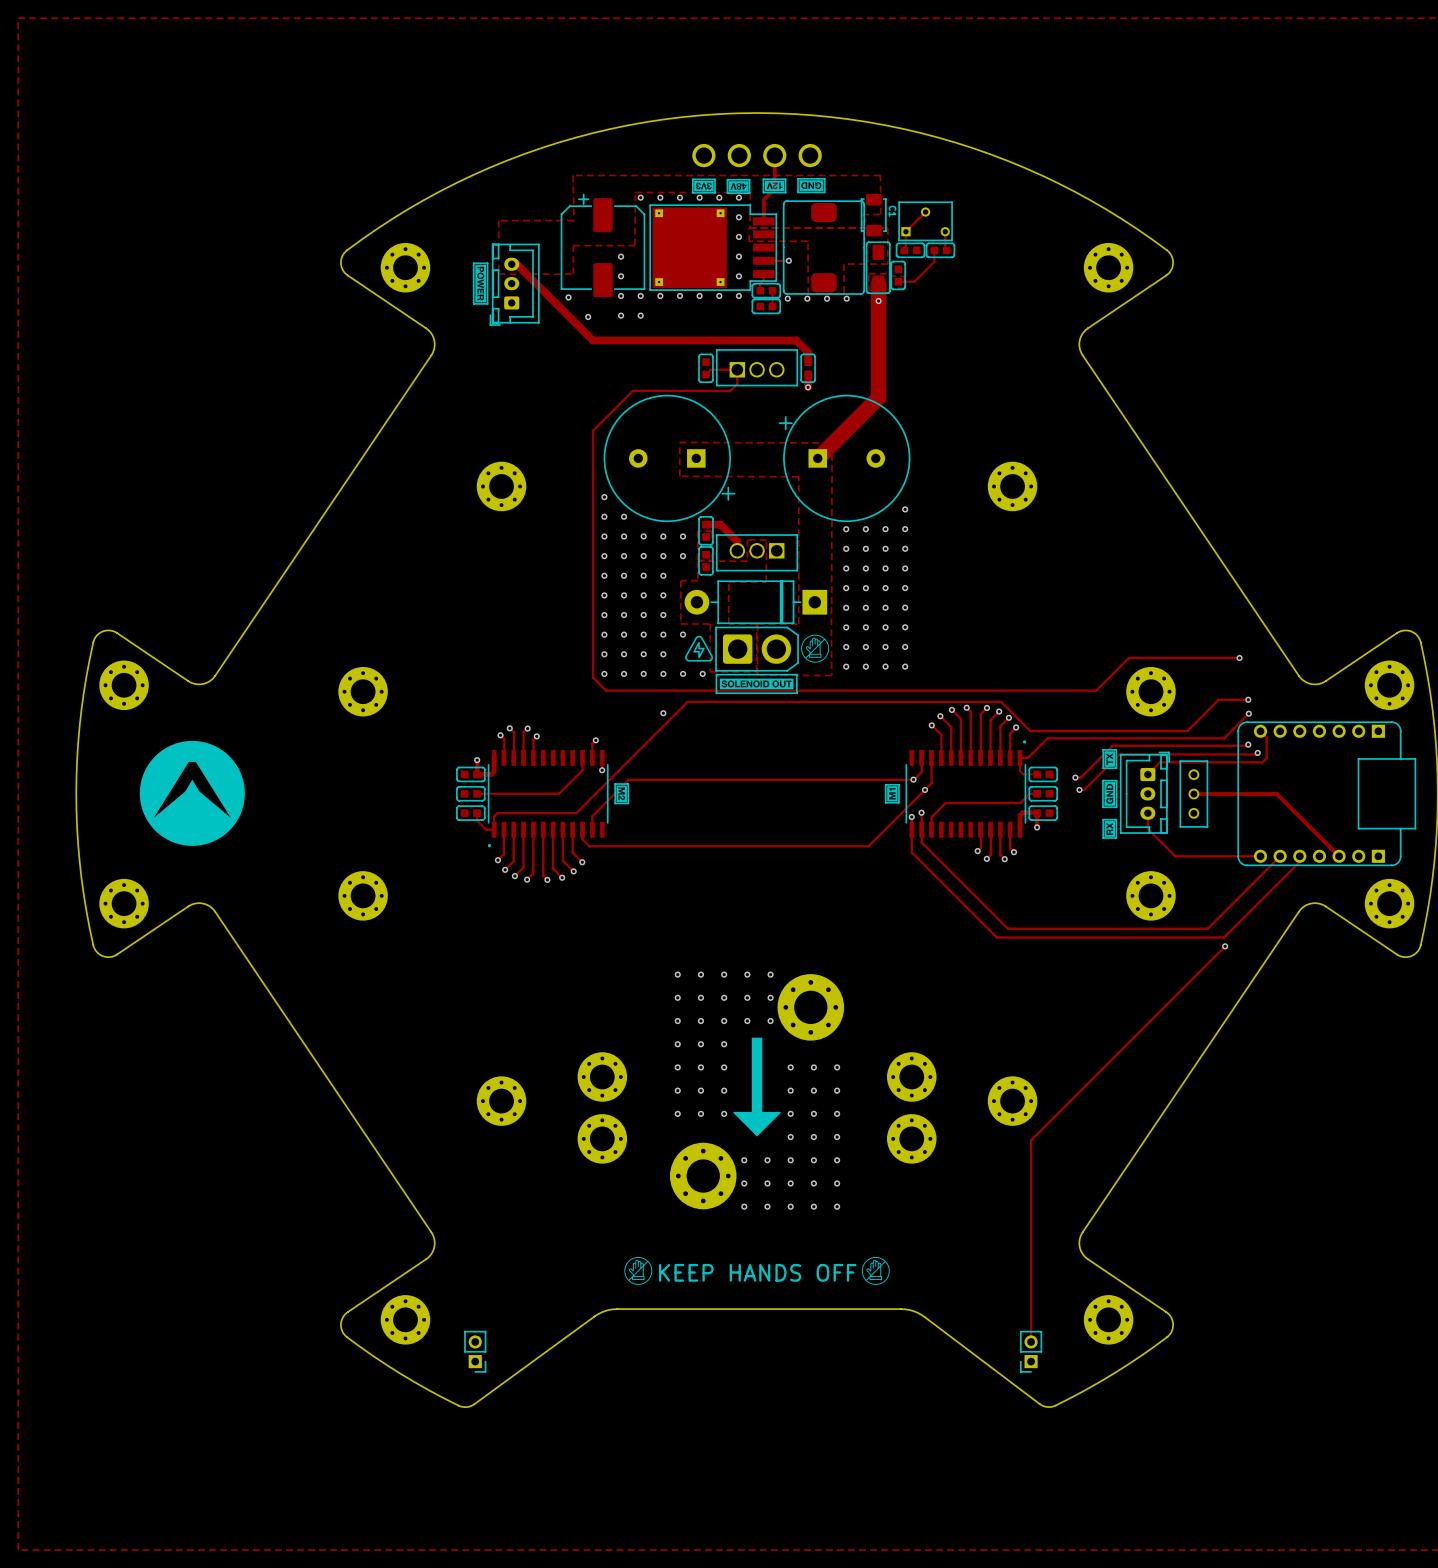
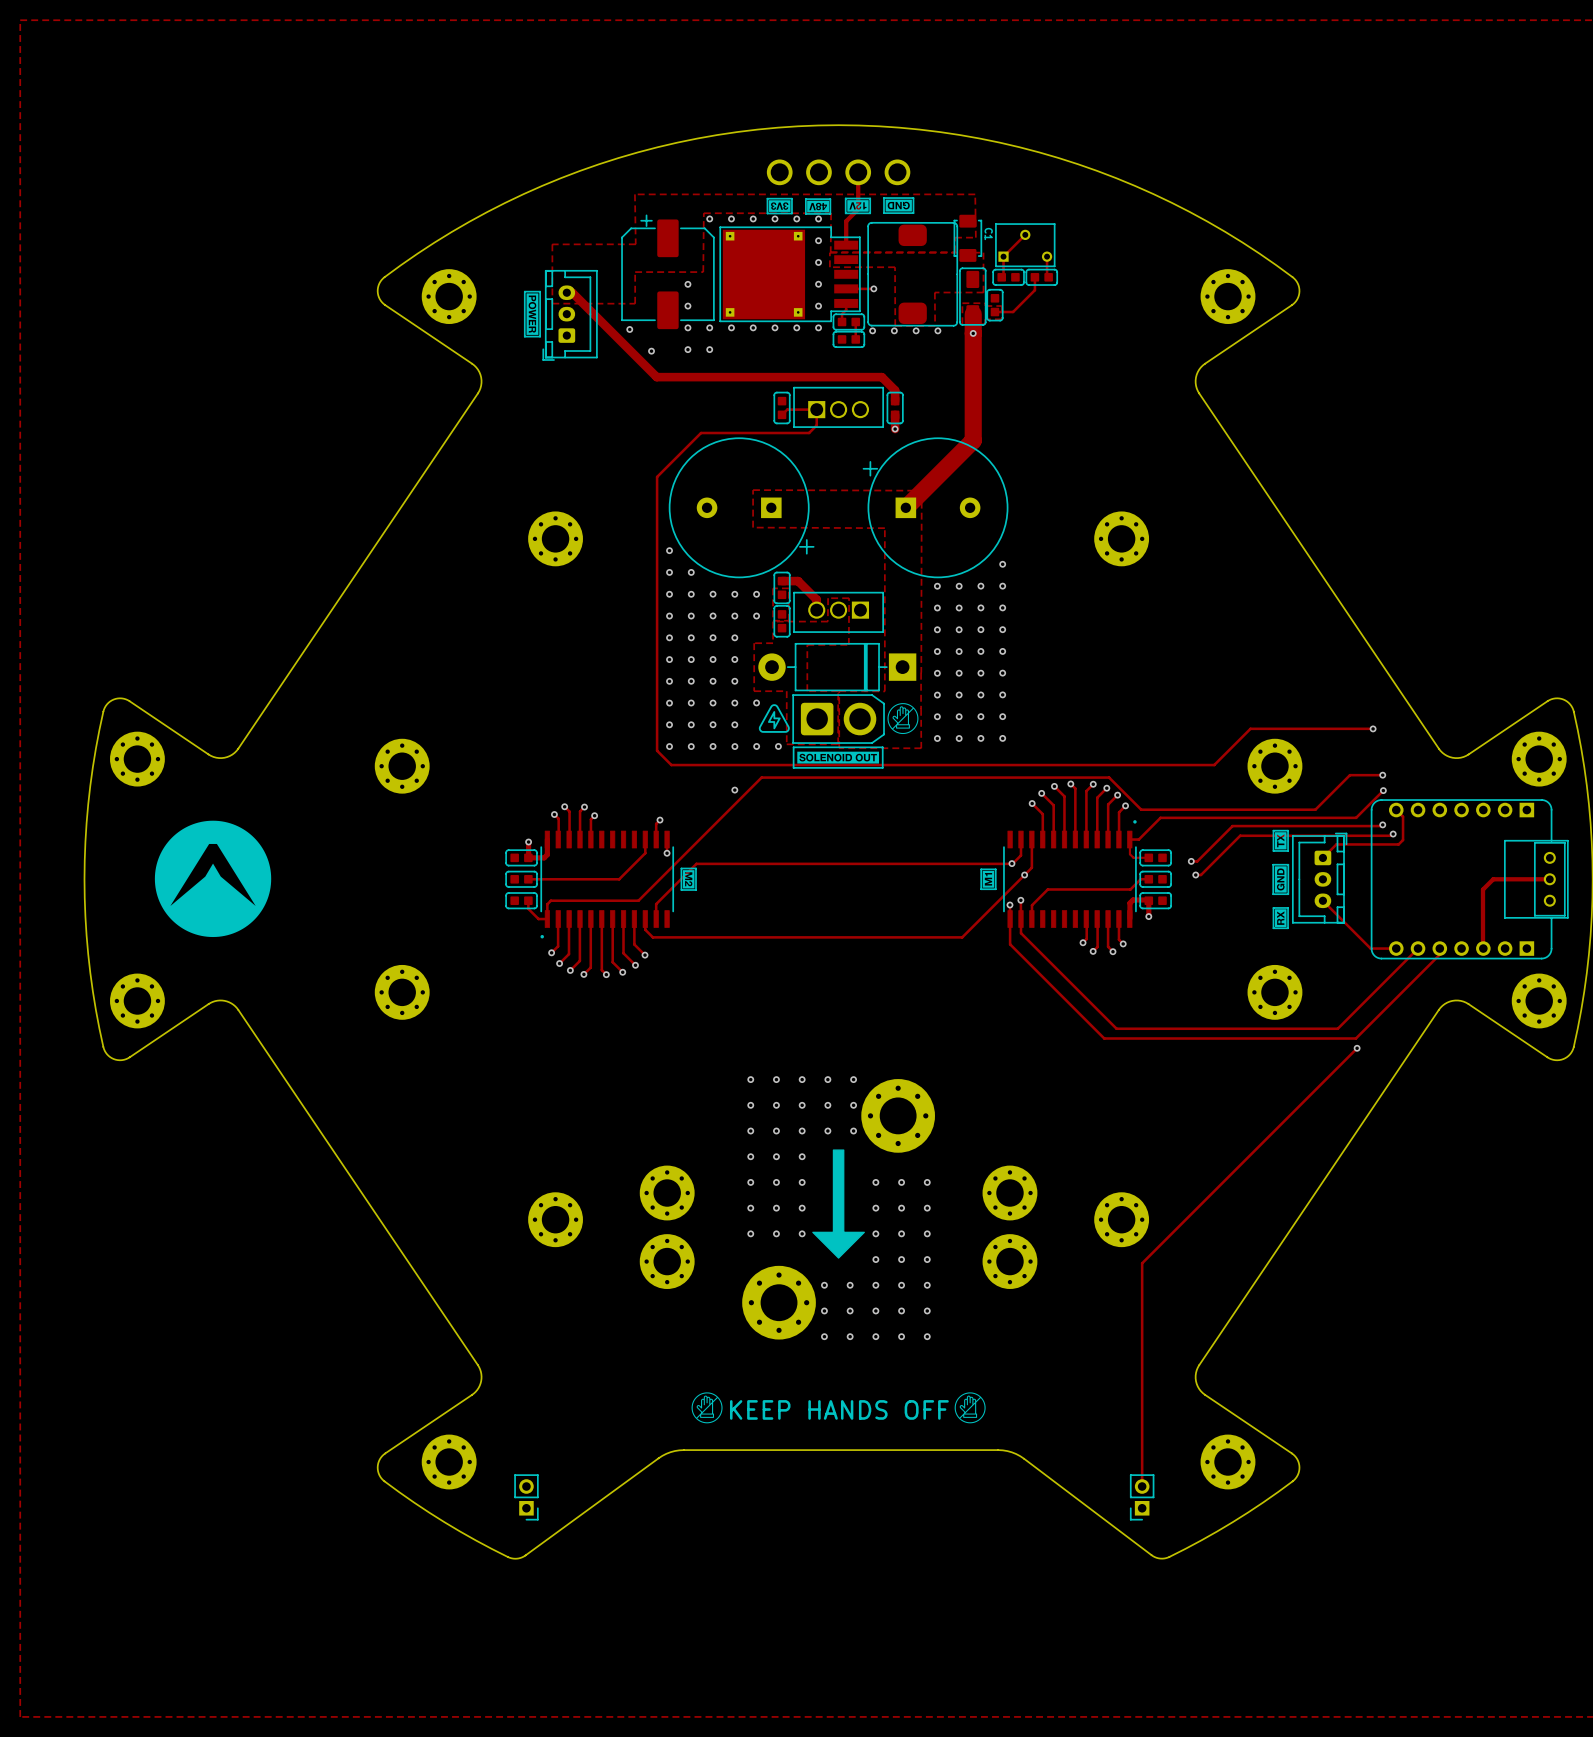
line: (1103, 749) (1103, 768) (1116, 768) (1116, 749) (1103, 749) -> (1273, 830) (1273, 850) (1288, 850) (1288, 830) (1273, 830)
drawing position: (1109, 759) -> (1280, 840)
part footprint: [1179, 760, 1208, 828] -> [1292, 833, 1348, 924]
track: (1206, 762) (1160, 762) (1147, 774) -> (1336, 844) (1322, 857)
line: (1102, 780) (1102, 807) (1116, 807) (1116, 780) (1102, 780) -> (1273, 864) (1273, 894) (1288, 894) (1288, 864) (1273, 864)
part: (1144, 792) -> none
drawing position: (1109, 793) -> (1280, 879)
part: none -> (1549, 879)
track: (1193, 794) (1276, 794) (1338, 856) -> (1549, 879) (1493, 879) (1482, 889) (1482, 948)
track: (1147, 813) (1147, 828) (1175, 856) (1237, 856) -> (1322, 900) (1370, 948)
line: (1103, 819) (1116, 819) (1116, 838) (1103, 838) (1103, 819) -> (1273, 907) (1288, 907) (1288, 928) (1273, 928) (1273, 907)
drawing position: (1109, 828) -> (1280, 918)

